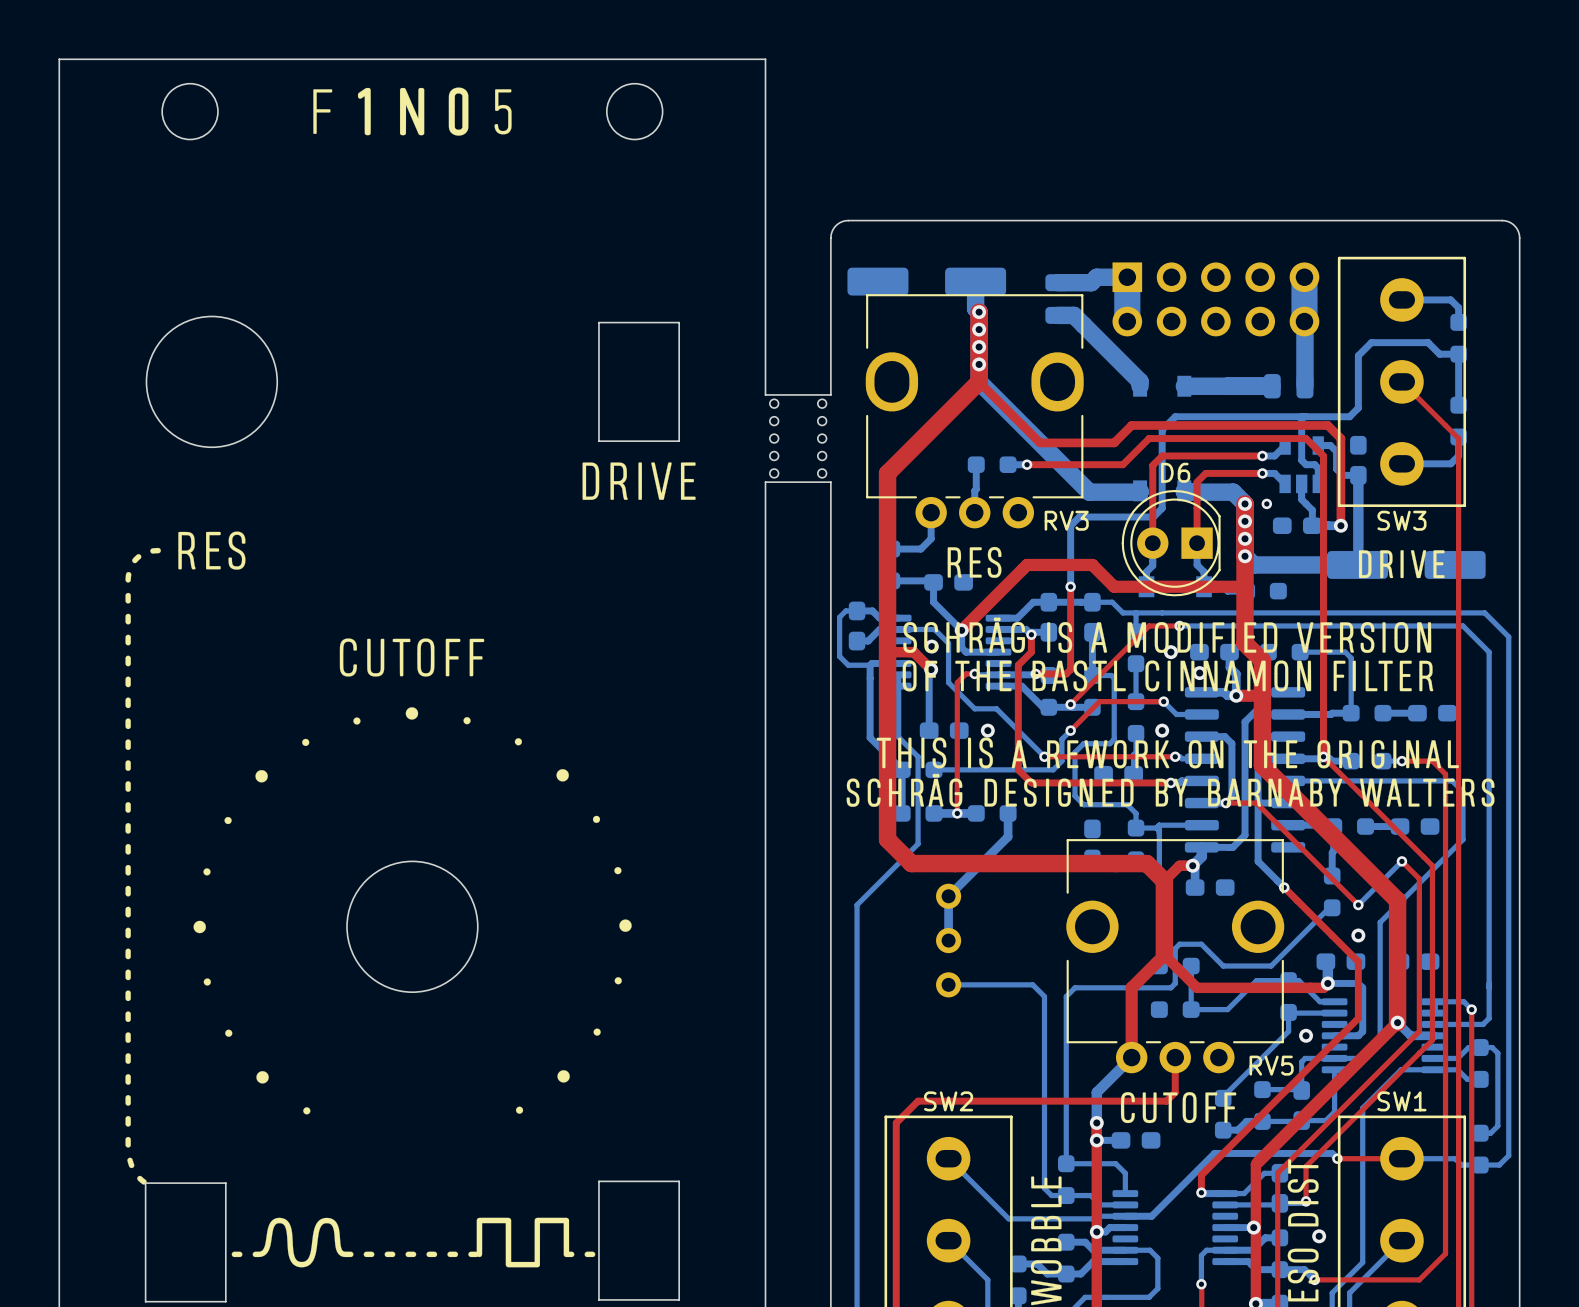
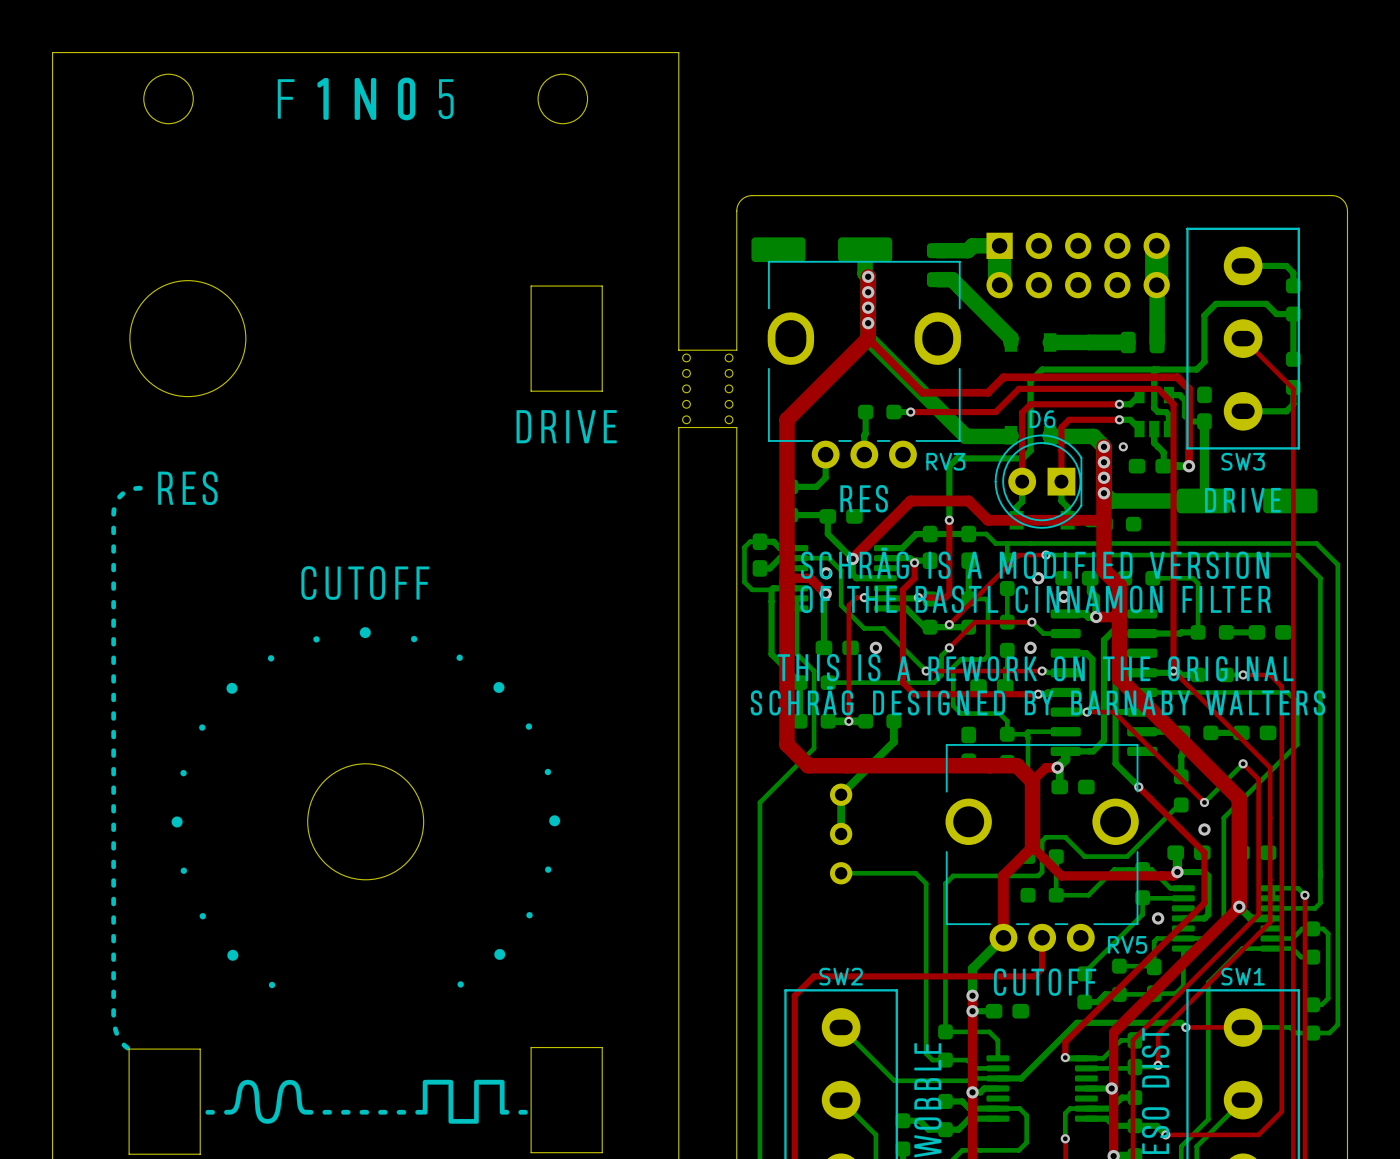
via: (1319, 1236) -> none

